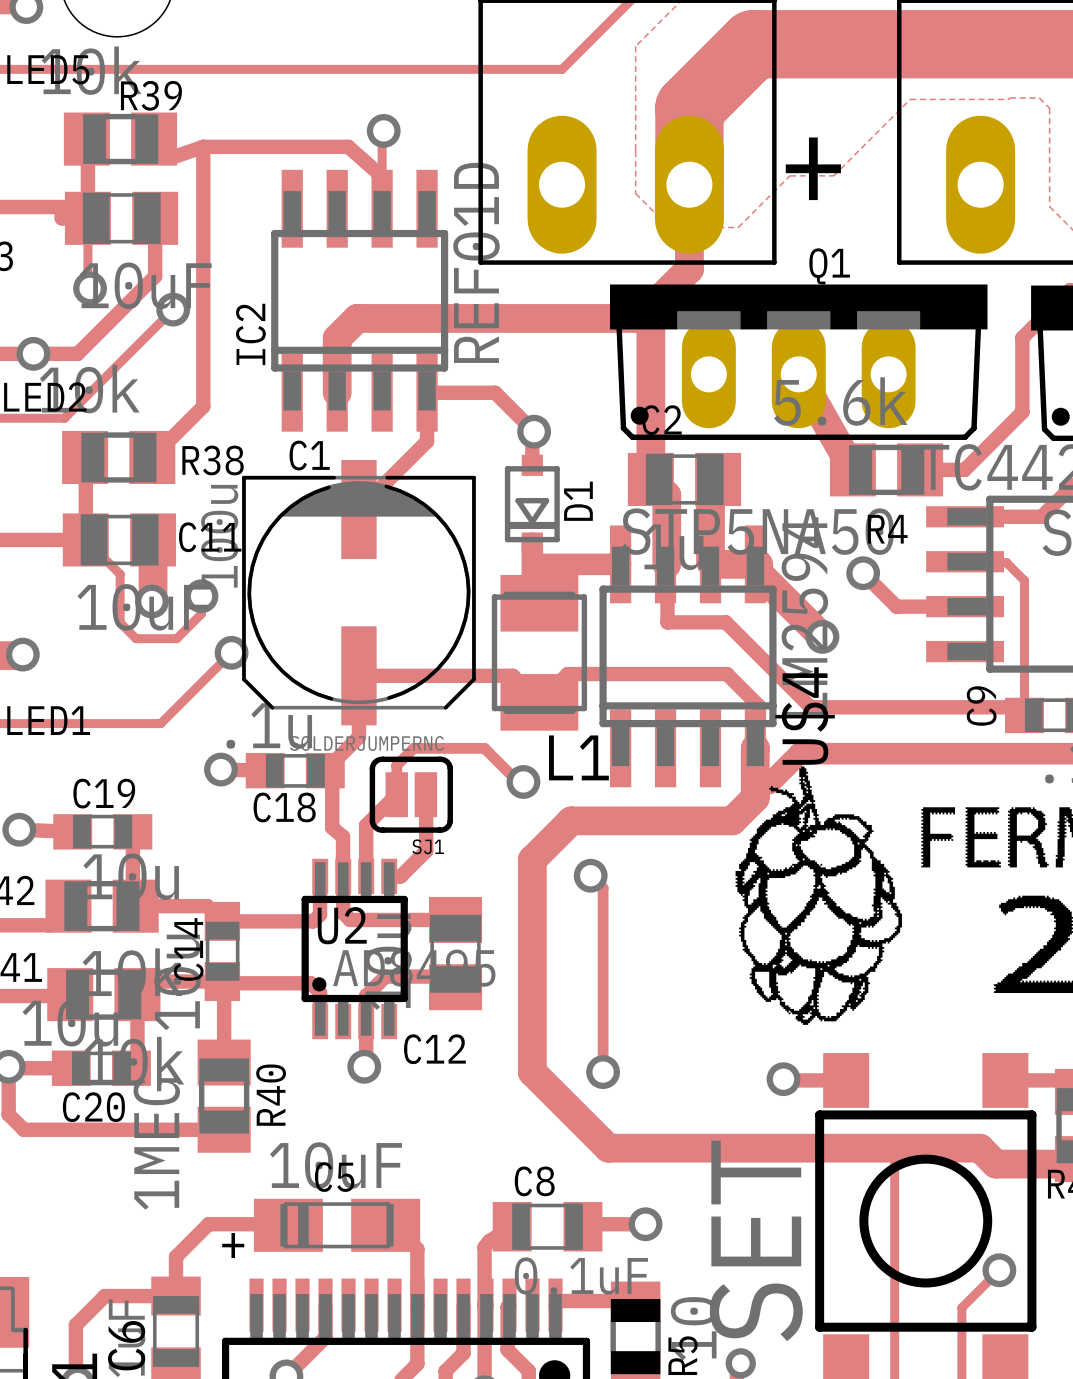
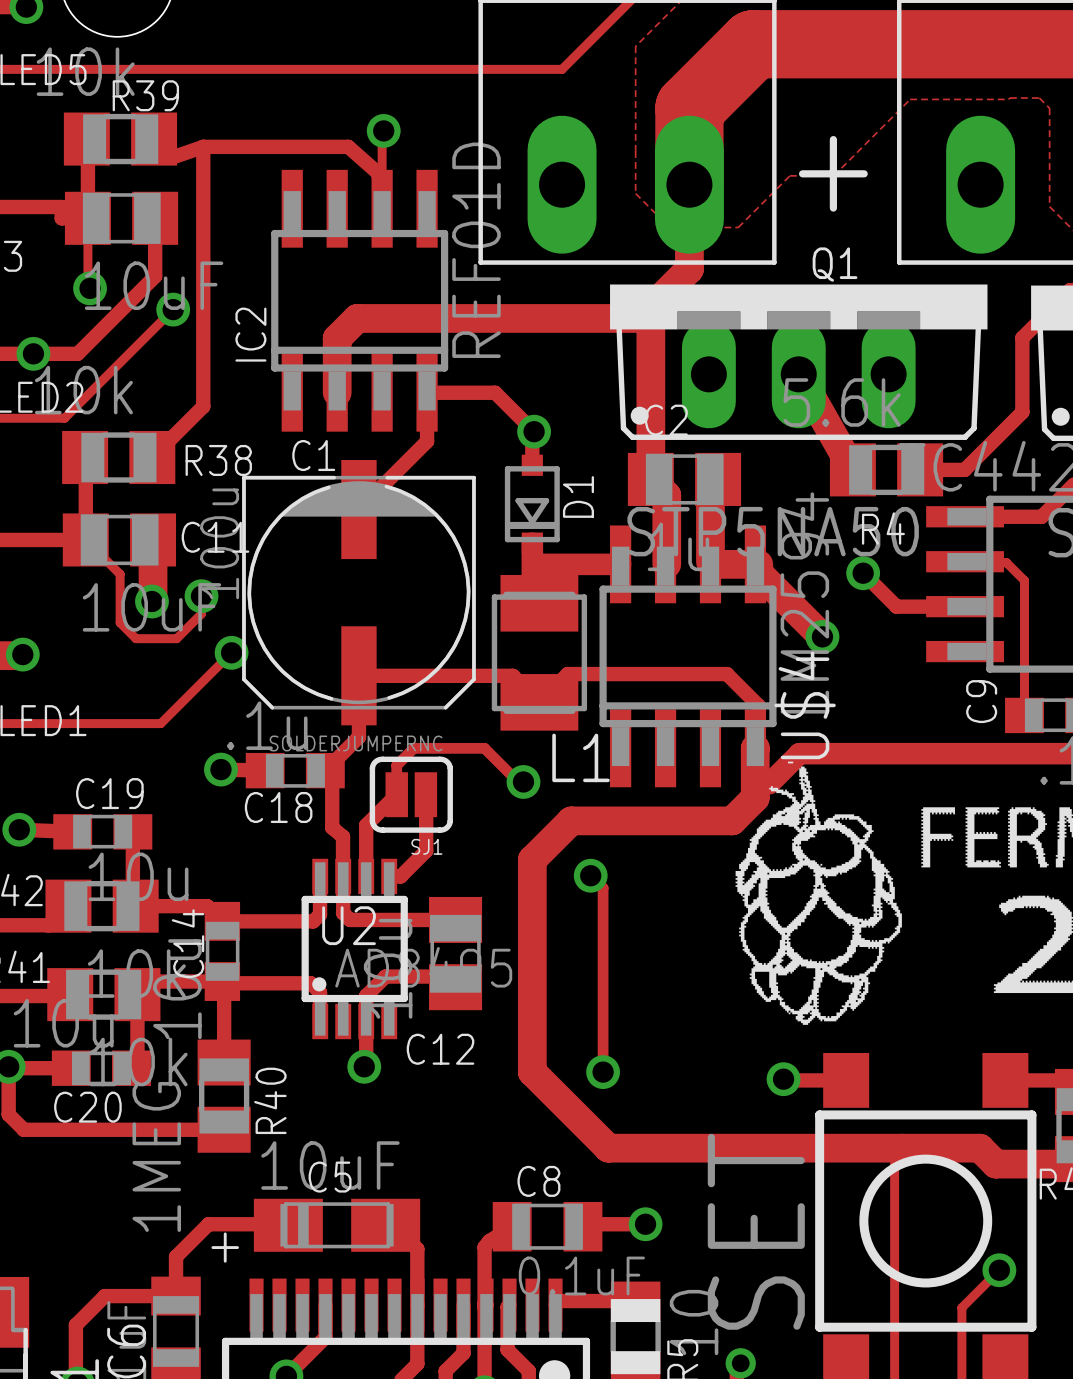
track: (667, 564) (667, 622) (725, 622) (810, 707) (1016, 707) (1024, 715) -> none

